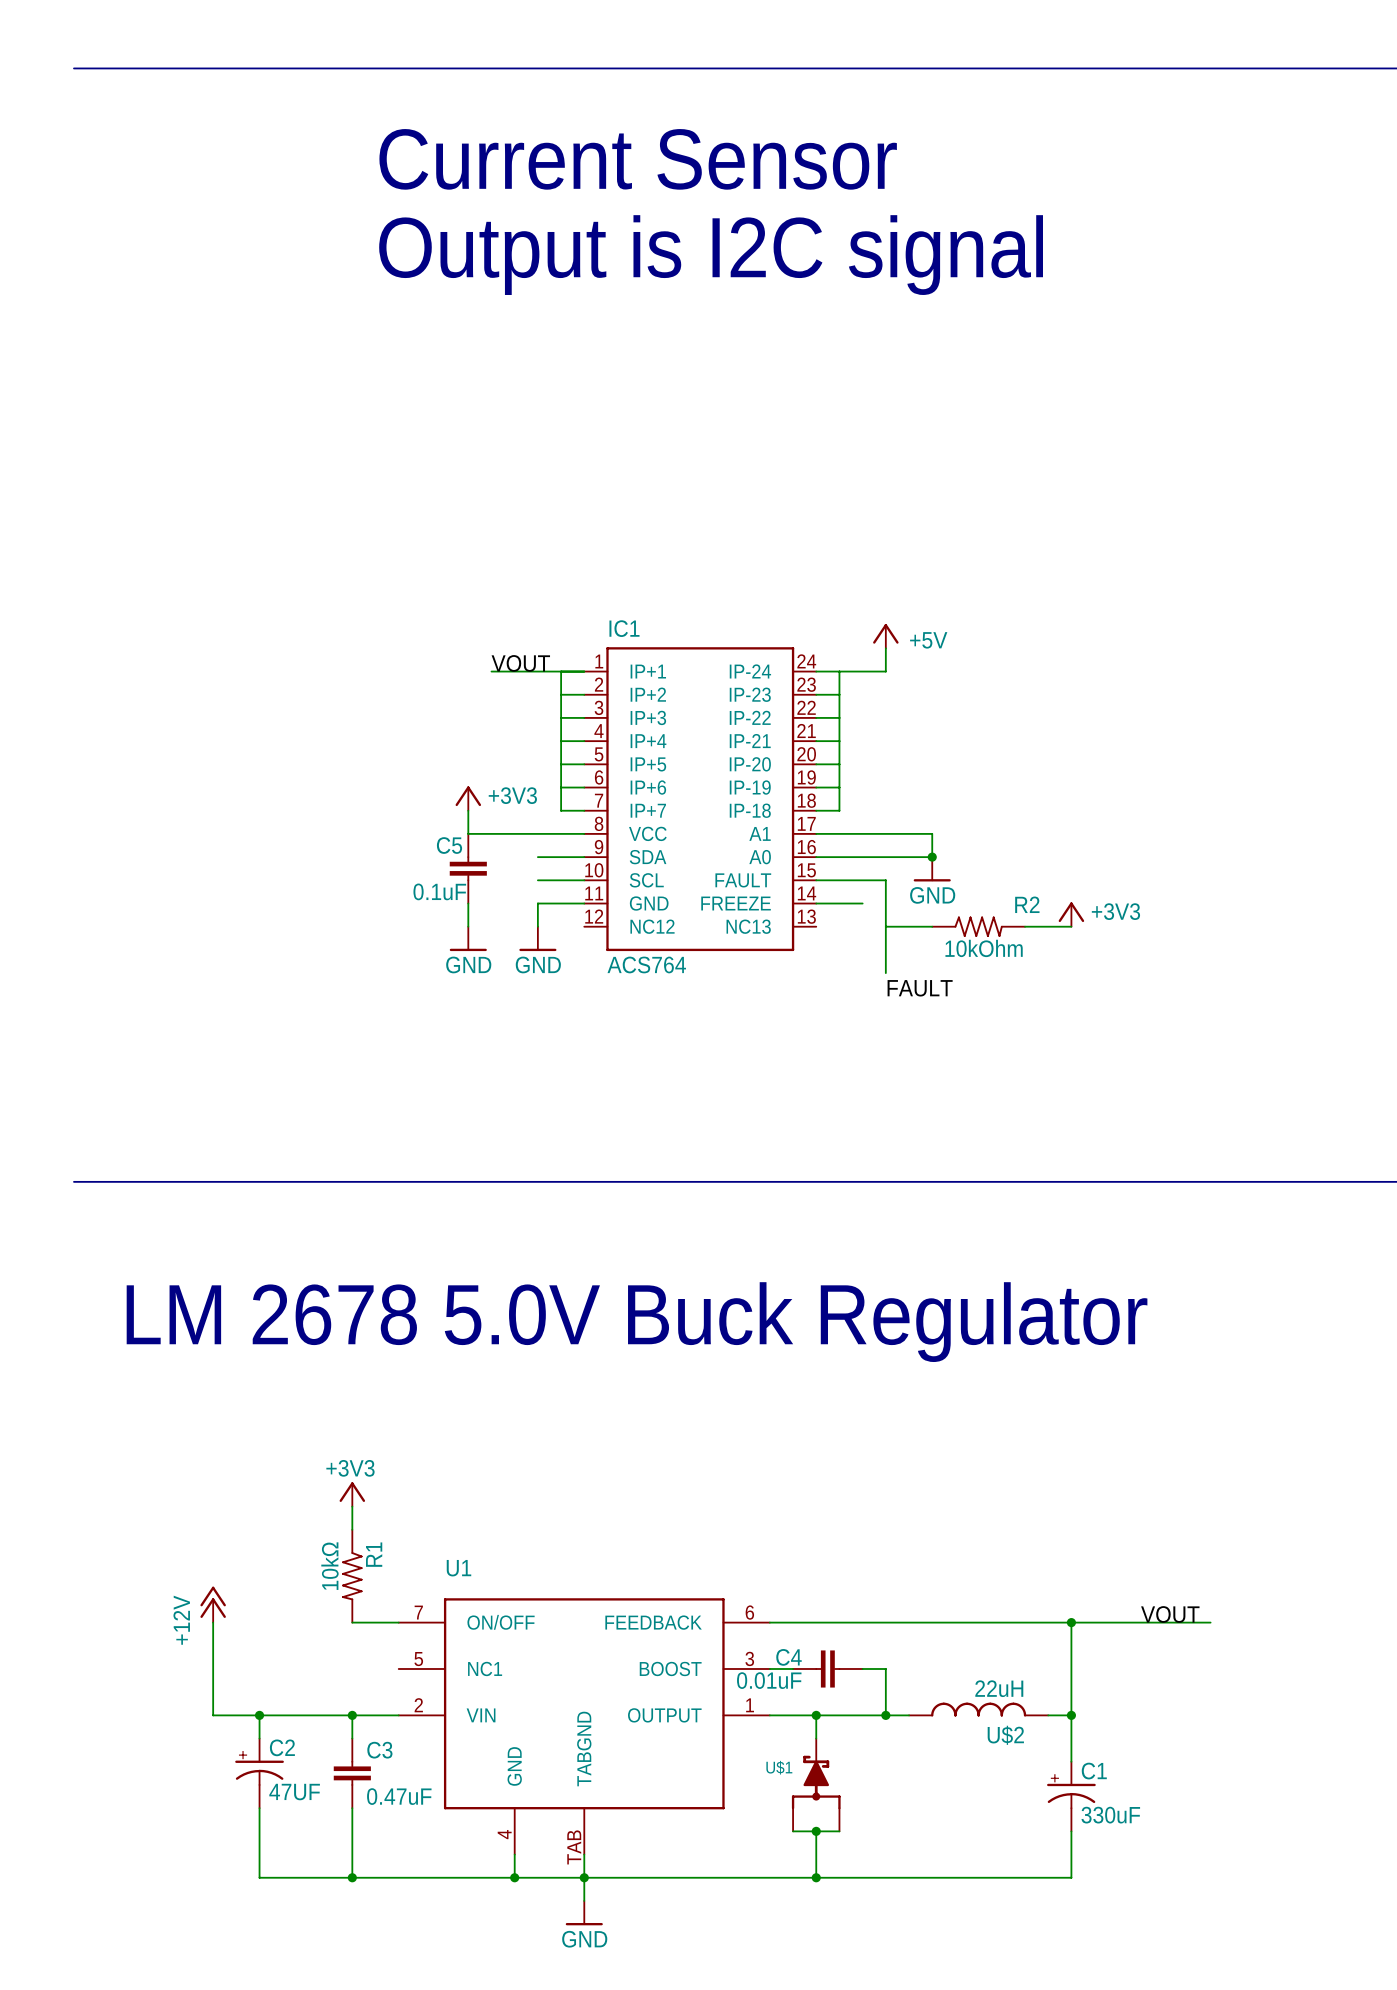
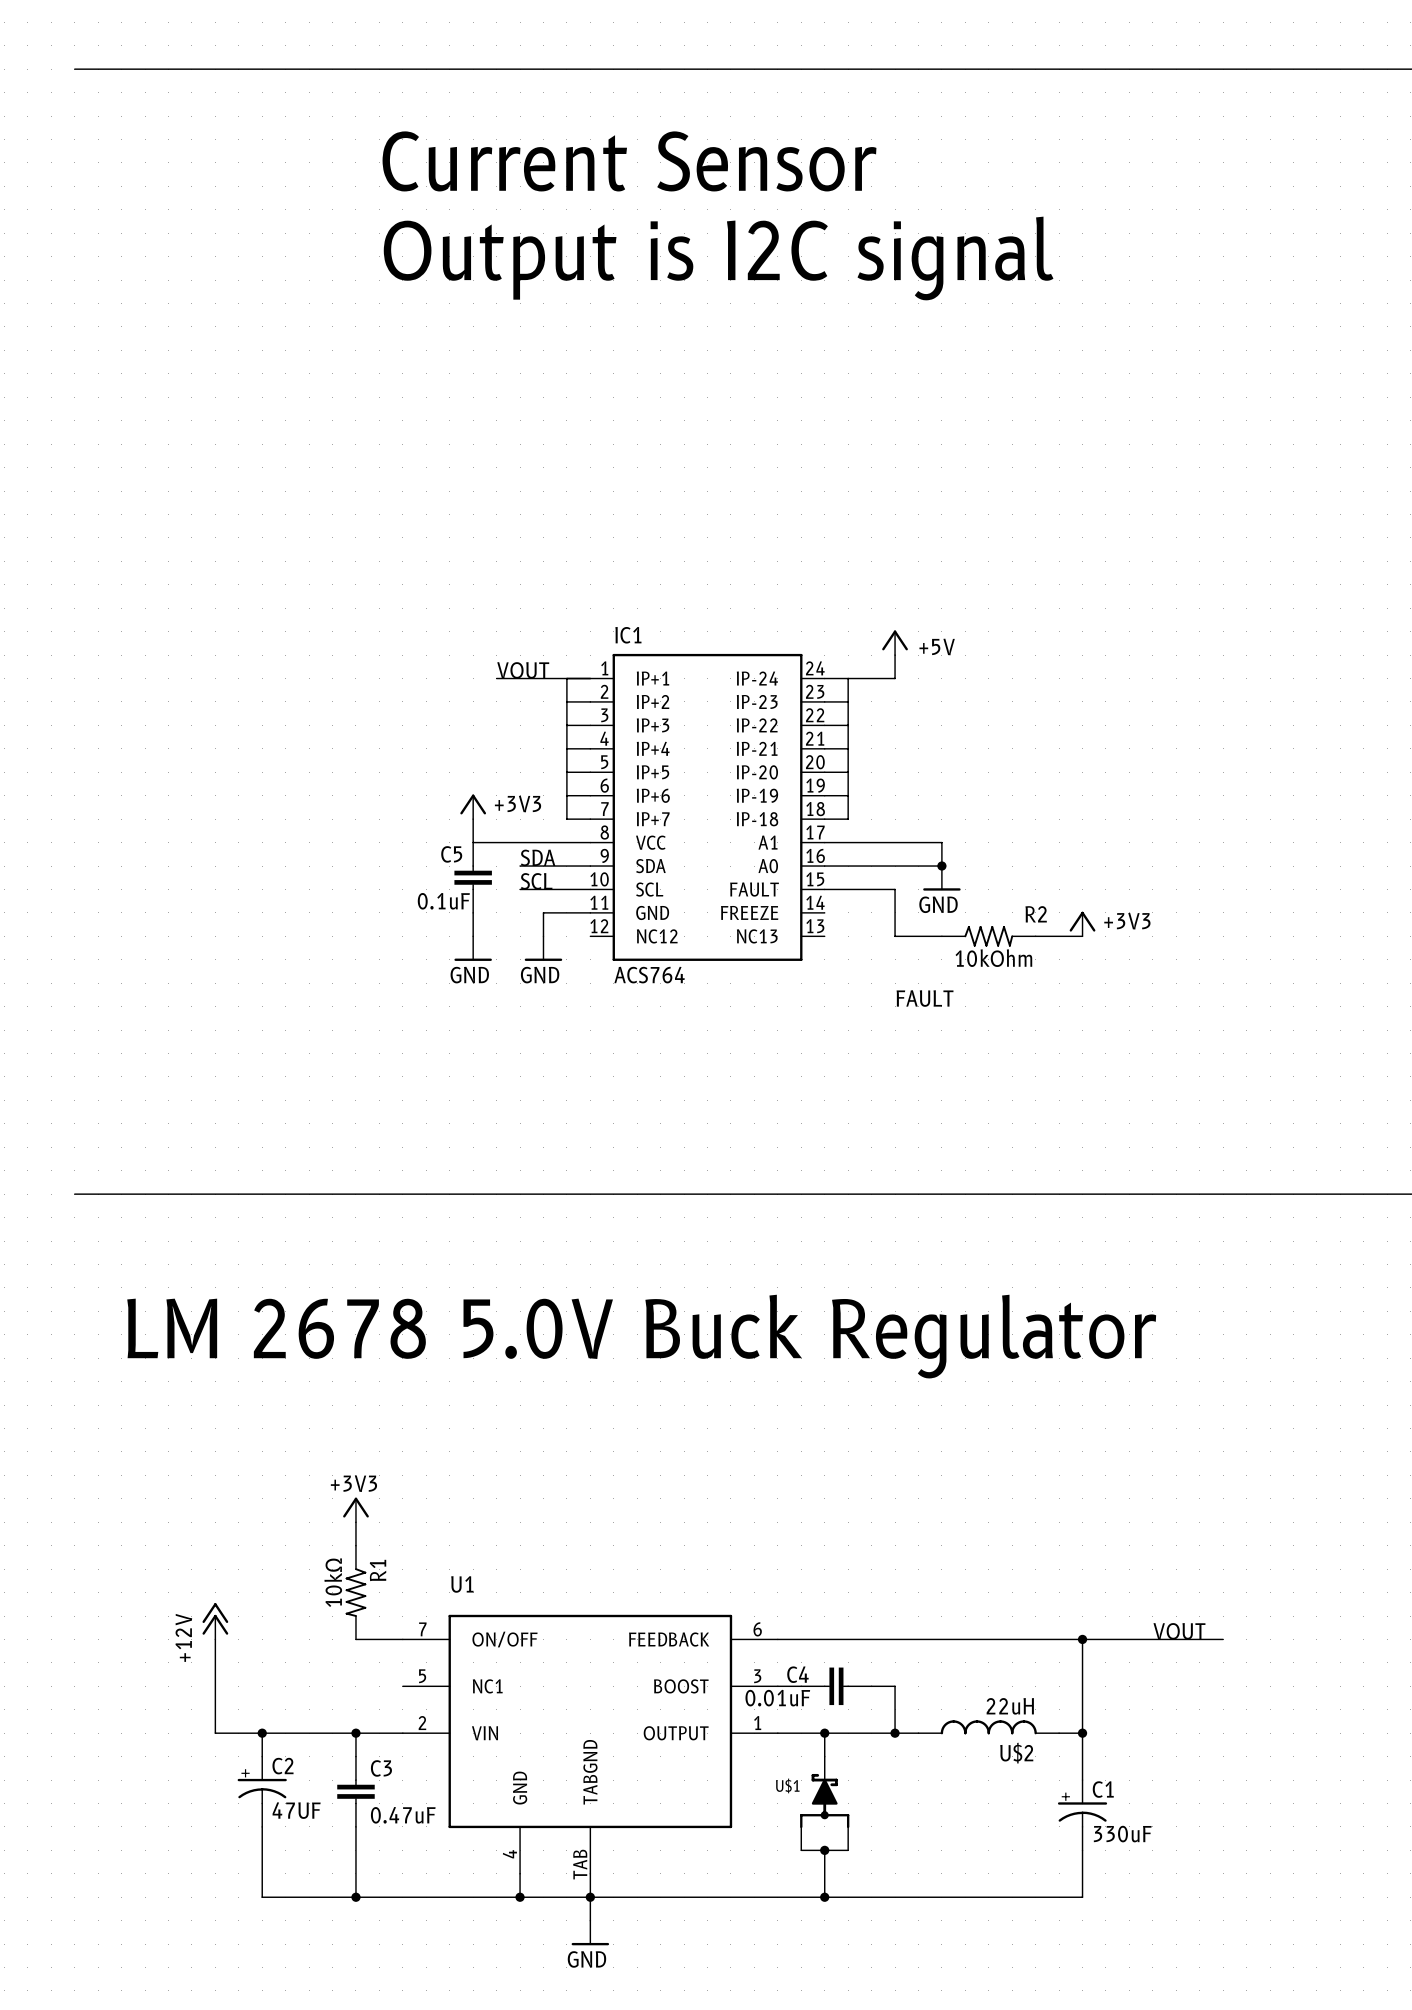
label: none -> SDA (538, 857)
wire: none -> (520, 866) (543, 866)
label: none -> SCL (536, 881)
wire: none -> (520, 889) (543, 889)
wire: (816, 903) (862, 903) -> none
wire: (885, 926) (885, 973) -> none

